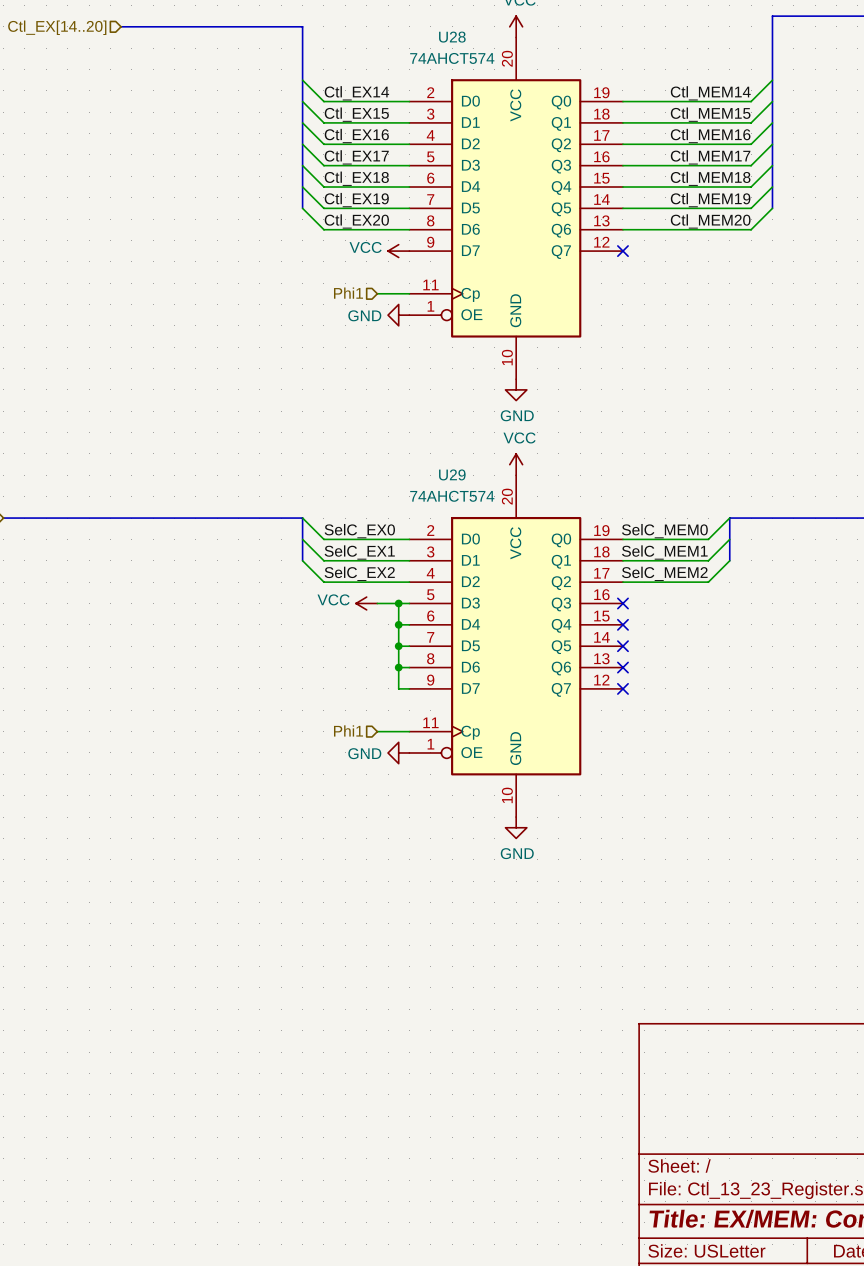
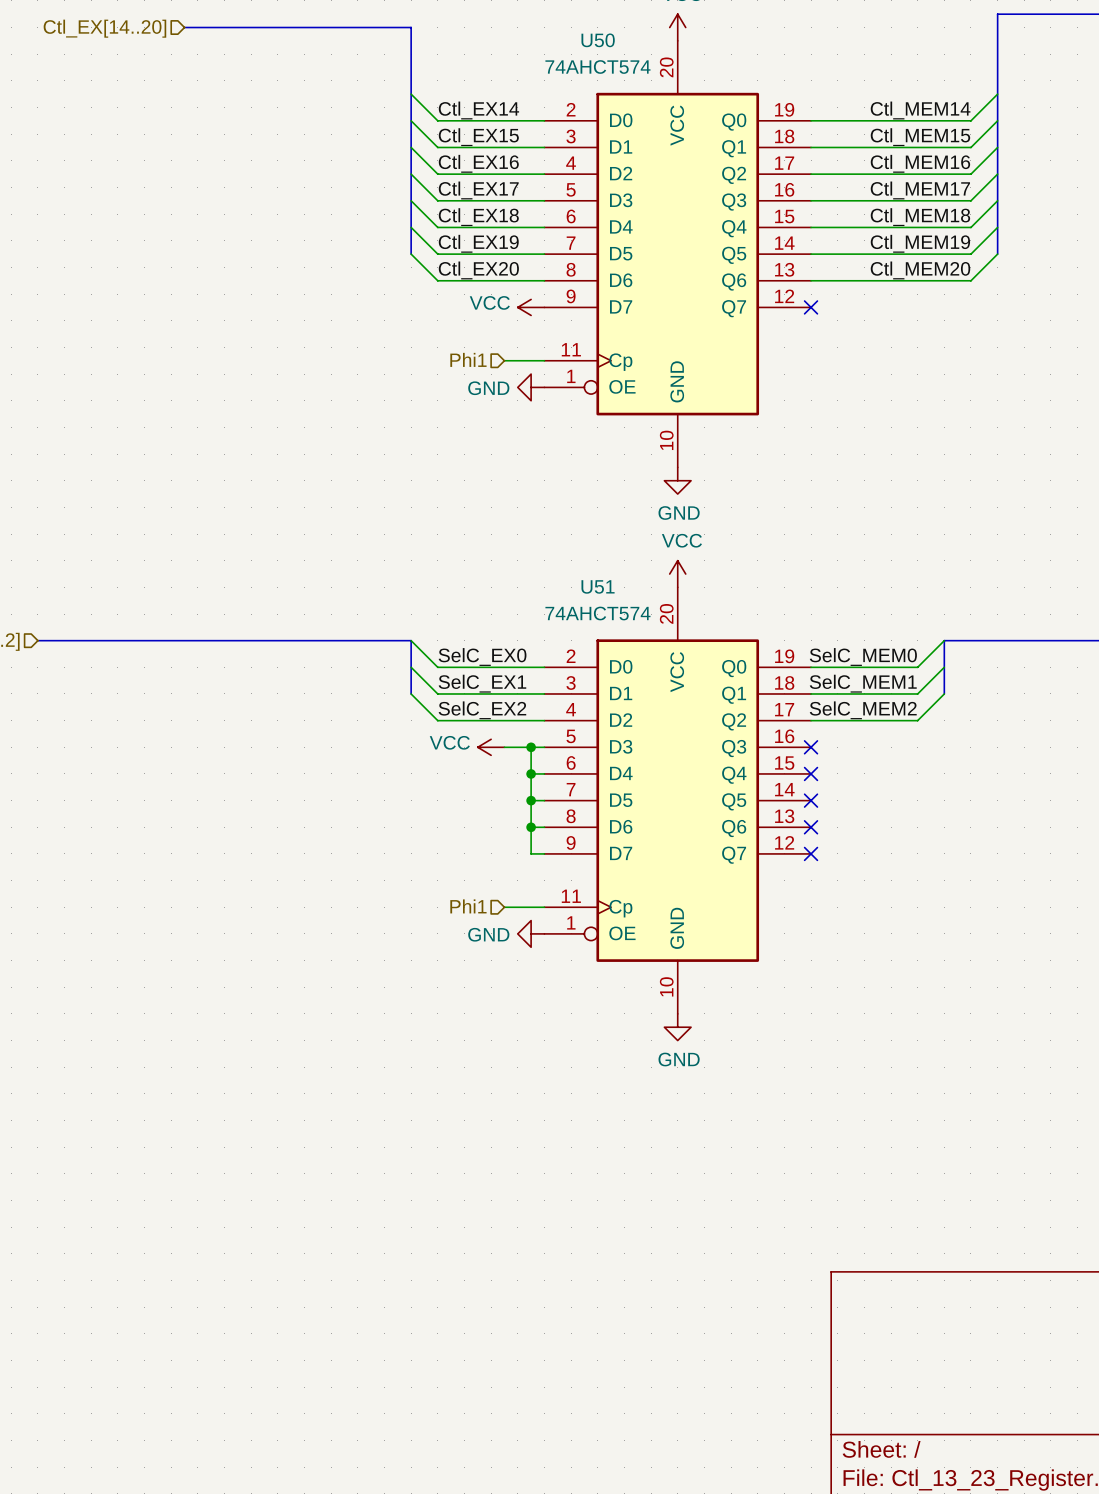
U28 name: U28 (452, 37) -> U50 (598, 40)
U29 name: U29 (452, 474) -> U51 (598, 586)

